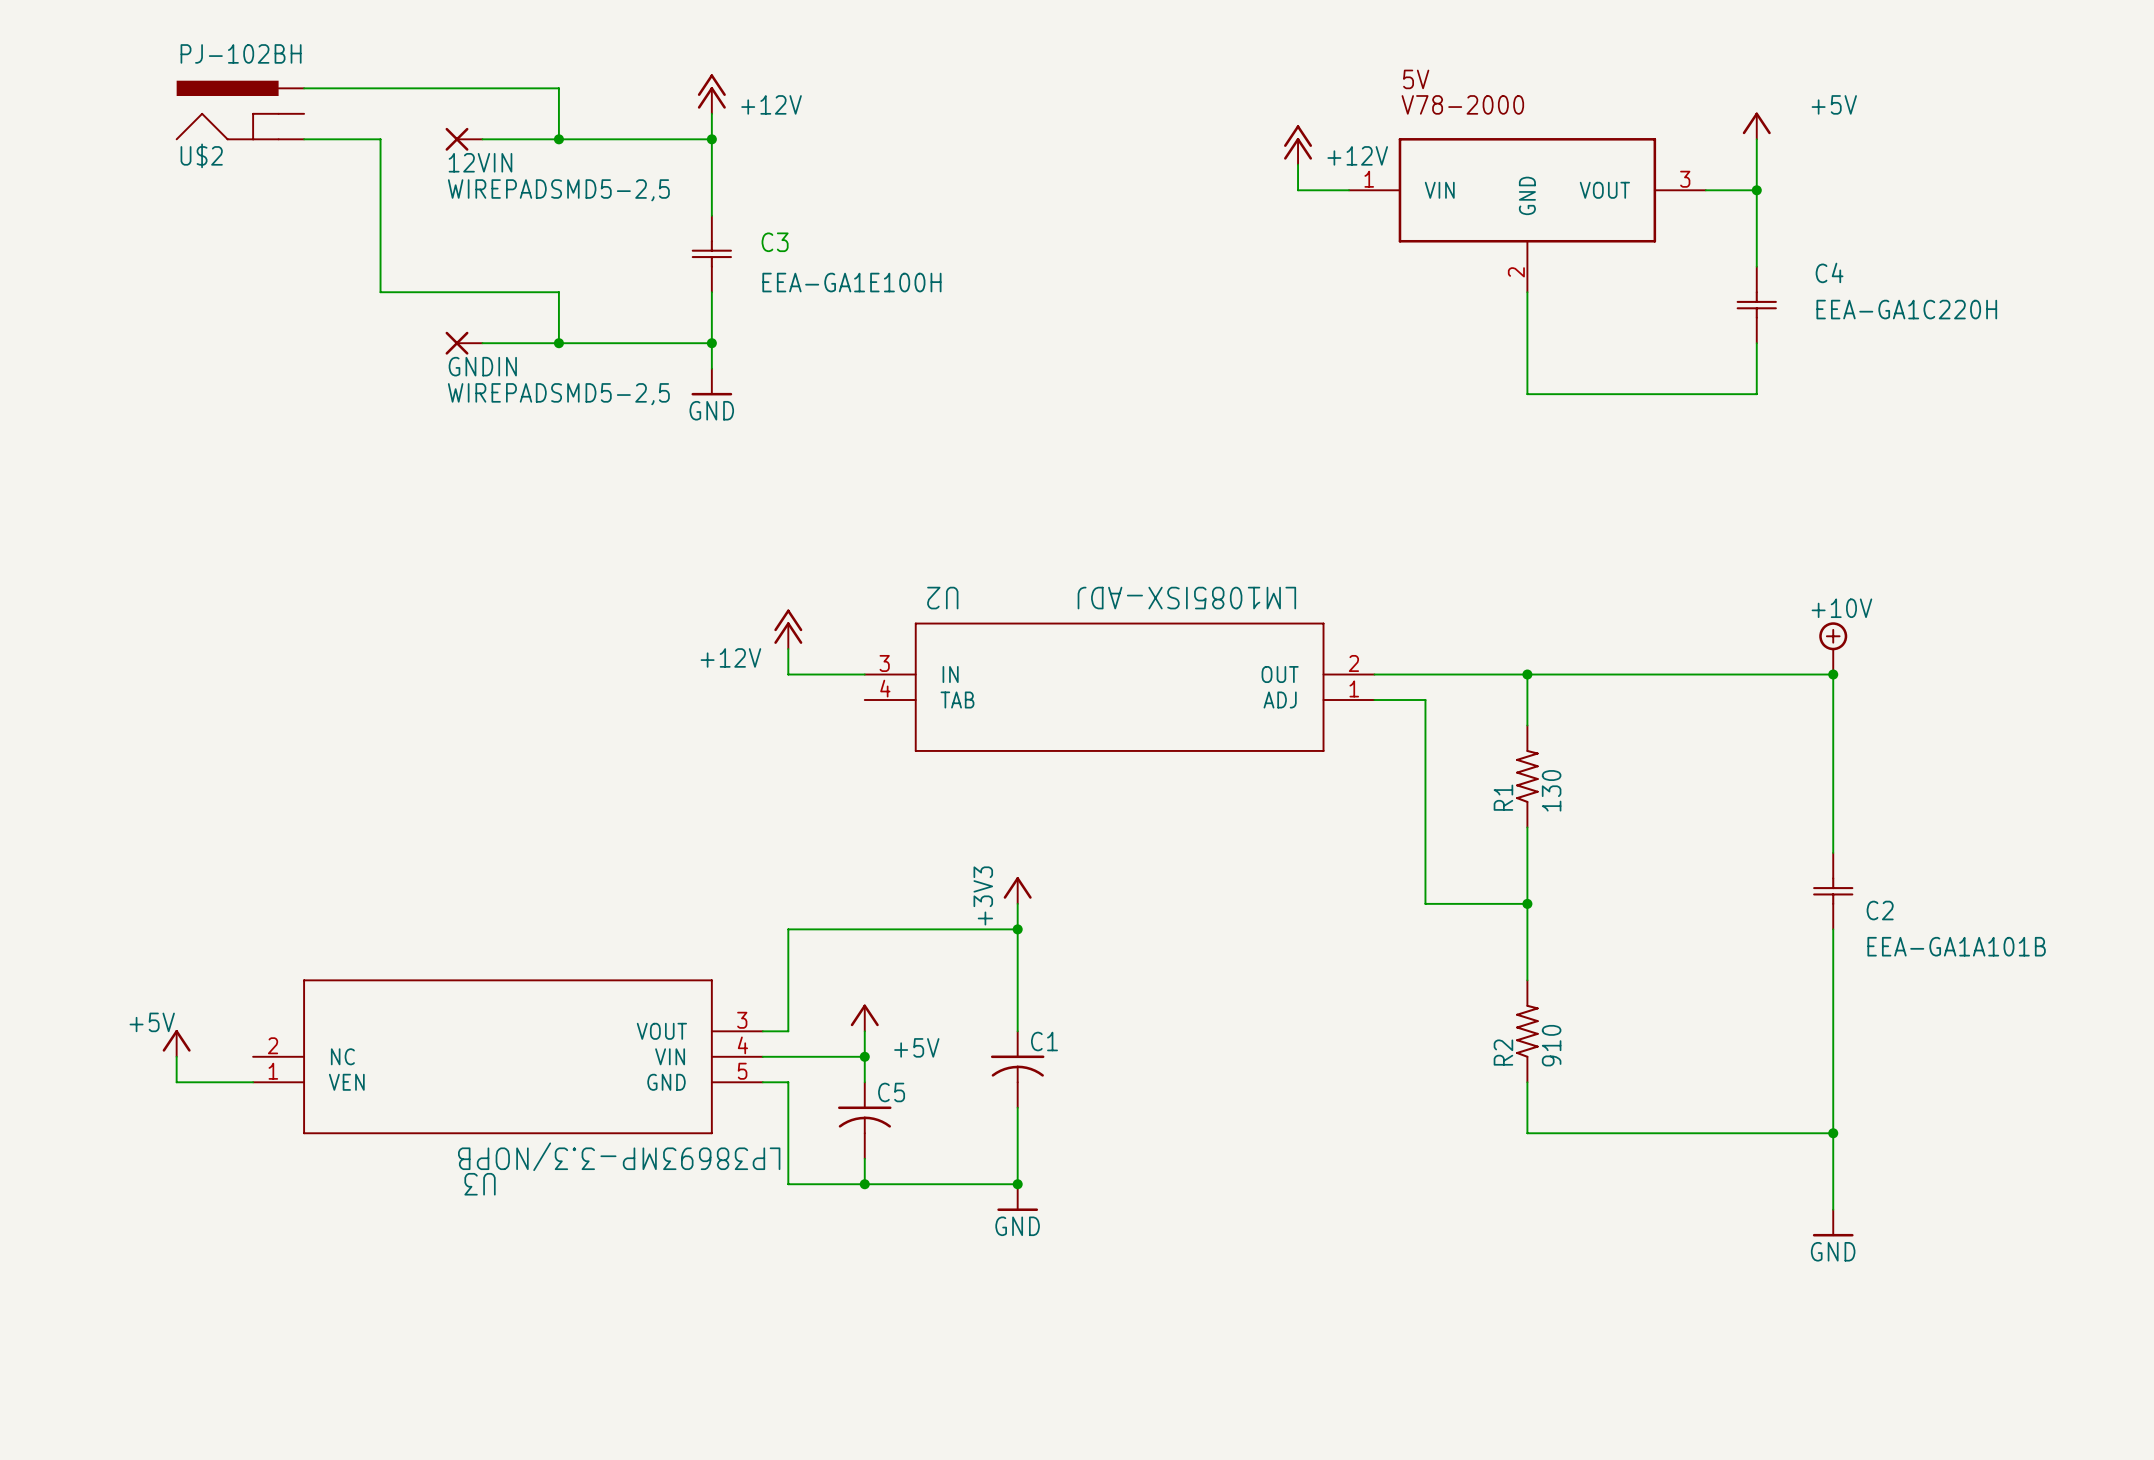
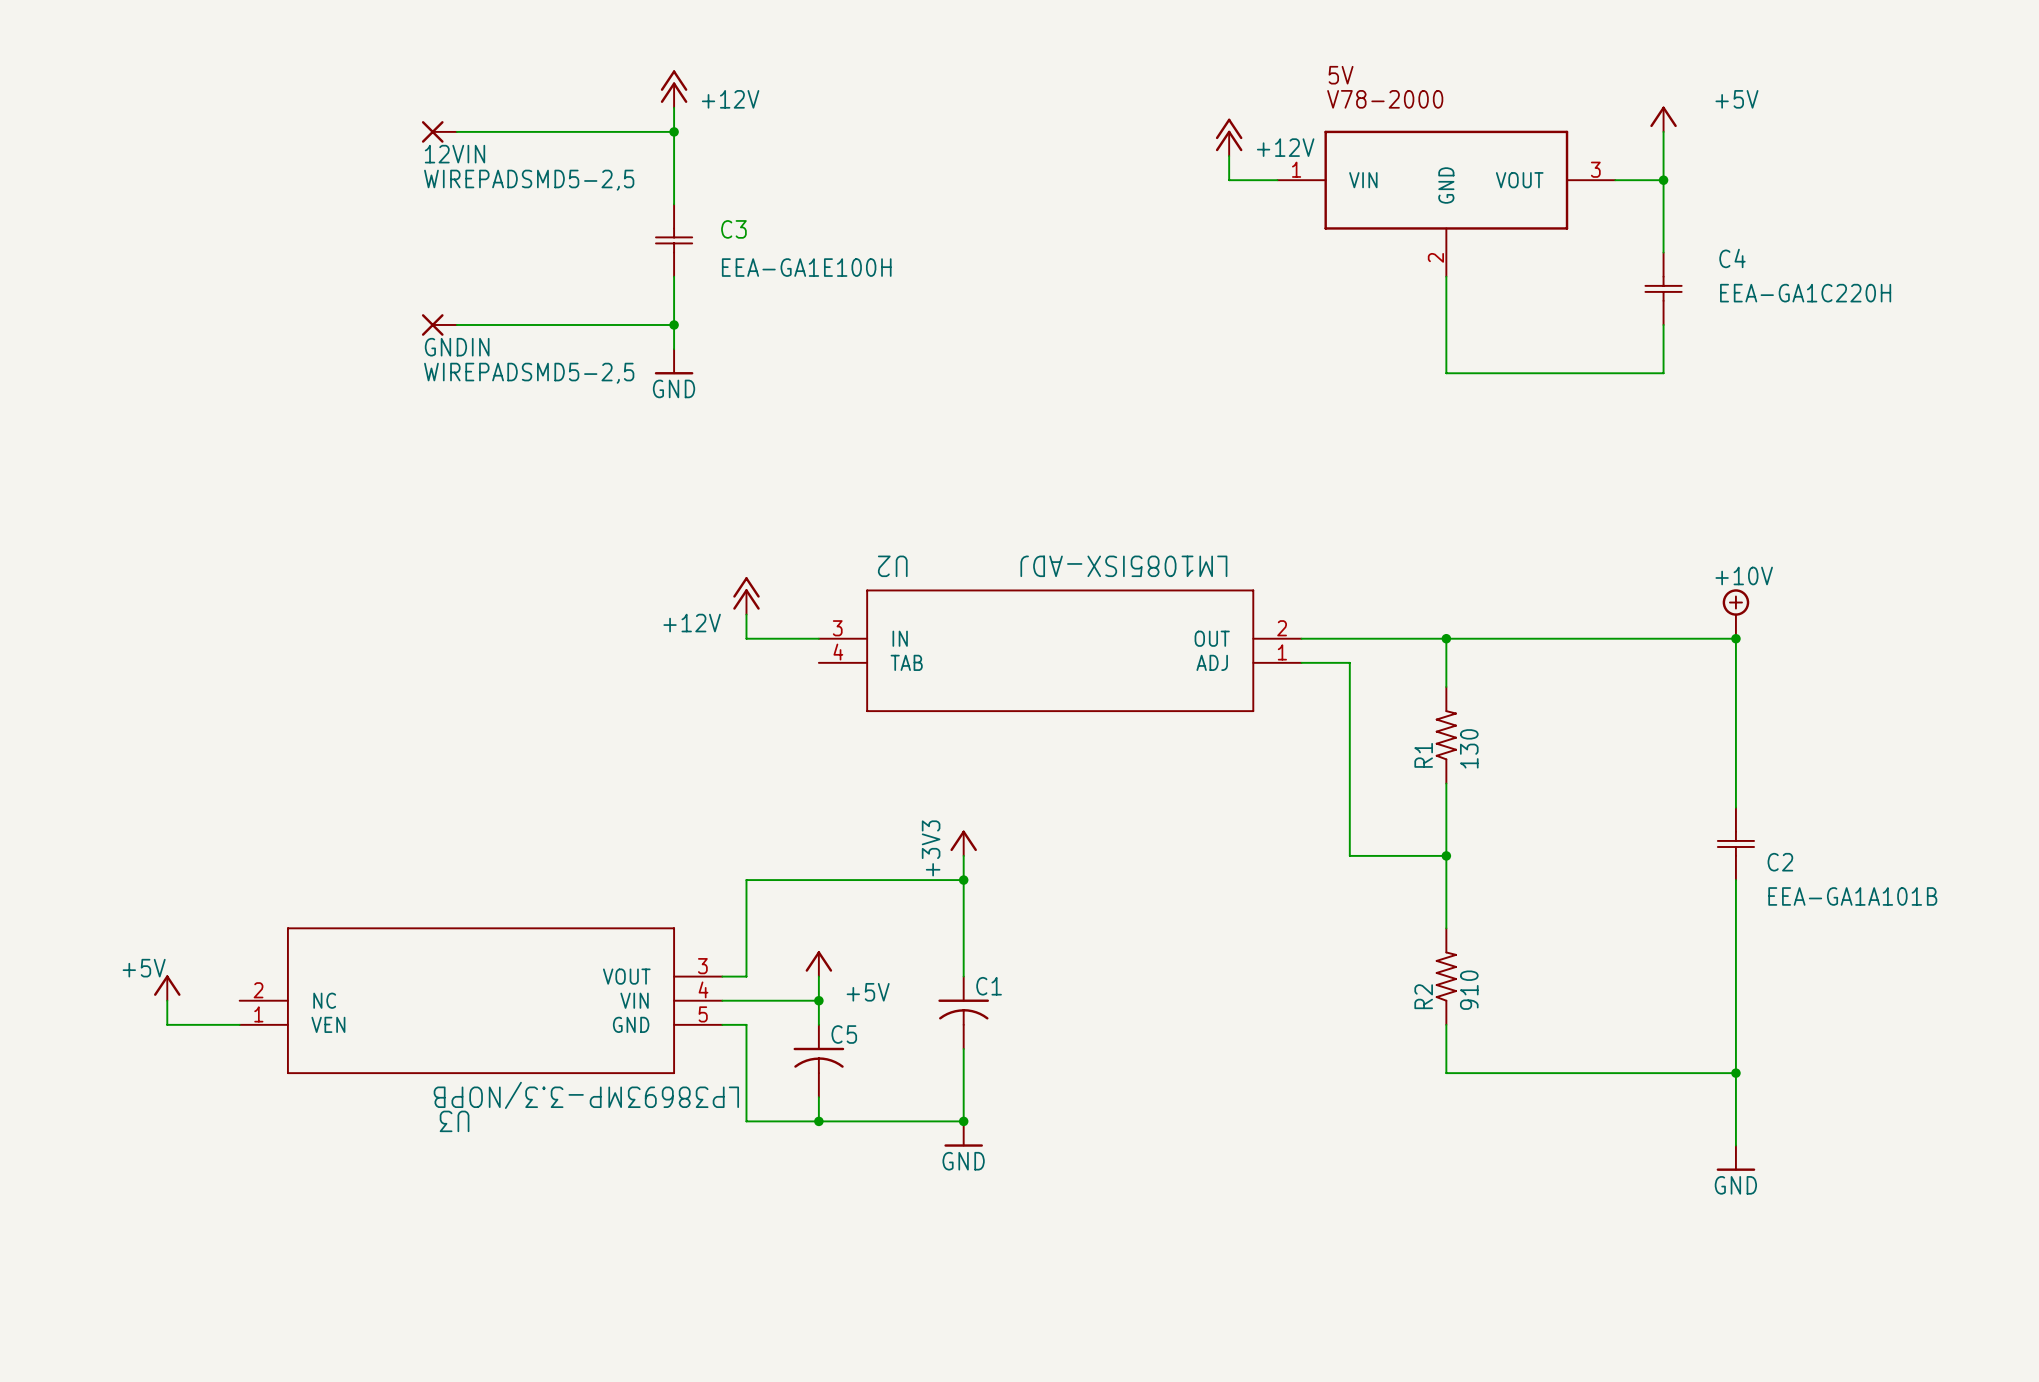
wire: (304, 88) (558, 88) (558, 139) -> none
U$2: PJ-102BH (239, 110) -> none
wire: (304, 139) (380, 139) (380, 292) (558, 292) (558, 343) -> none
junction: (558, 139) -> none
junction: (558, 343) -> none

